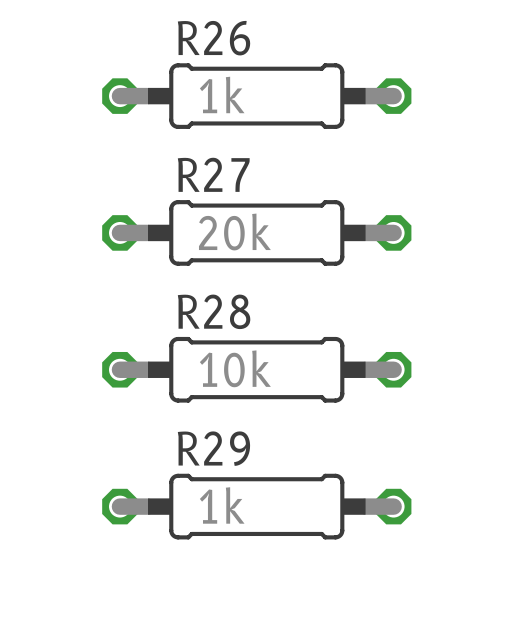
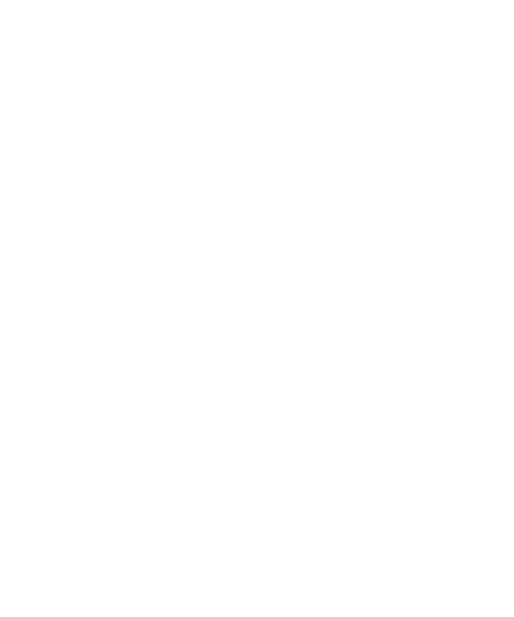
R26: 1k (256, 96) -> none
R27: 20k (256, 232) -> none
R28: 10k (256, 369) -> none
R29: 1k (256, 506) -> none

